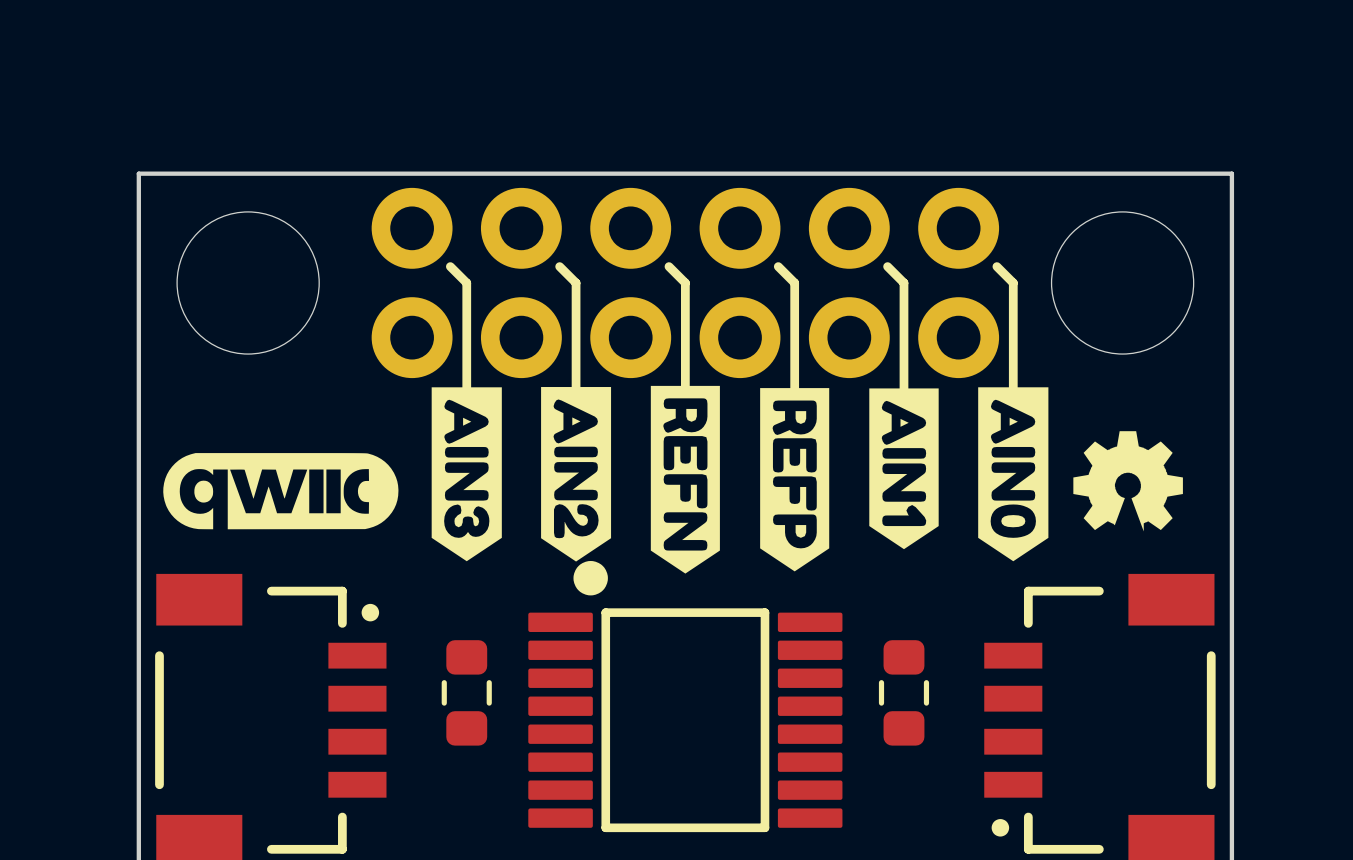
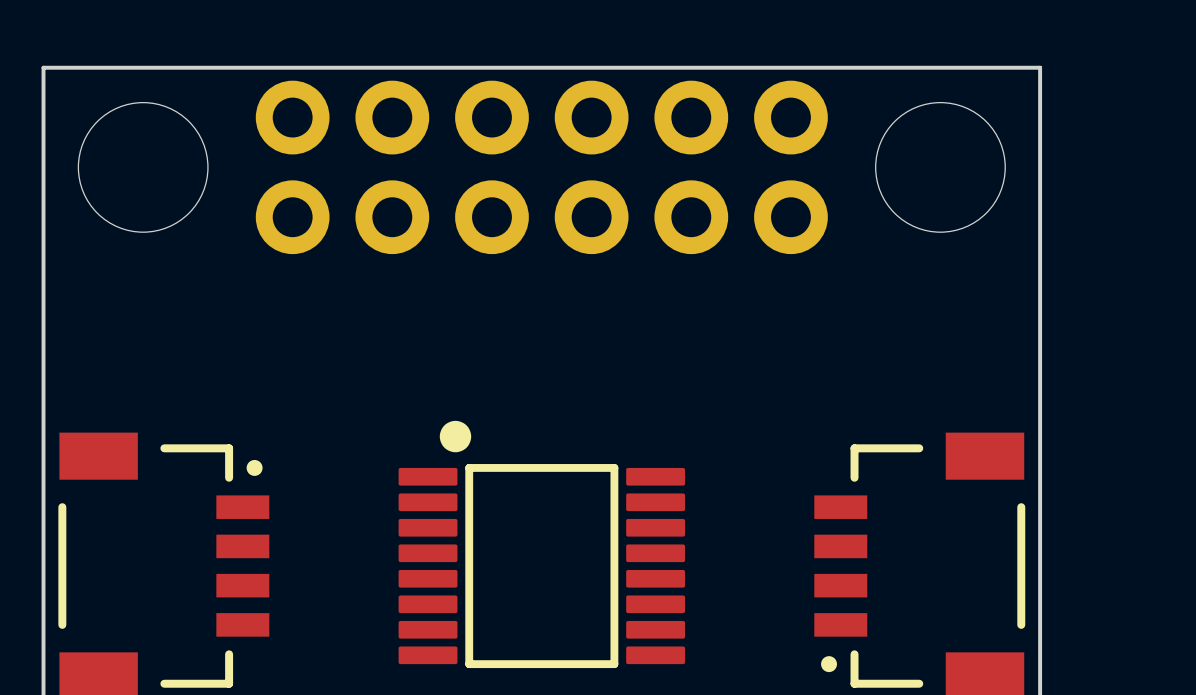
line: (450, 266) (466, 282) (466, 392) -> none
line: (559, 266) (576, 282) (576, 392) -> none
line: (668, 266) (685, 282) (685, 392) -> none
line: (778, 266) (794, 282) (794, 392) -> none
line: (887, 266) (903, 282) (903, 392) -> none
line: (996, 266) (1013, 282) (1013, 392) -> none
drawing: [163, 385, 1183, 574] -> none
part: (466, 692) -> none
part: (903, 692) -> none

